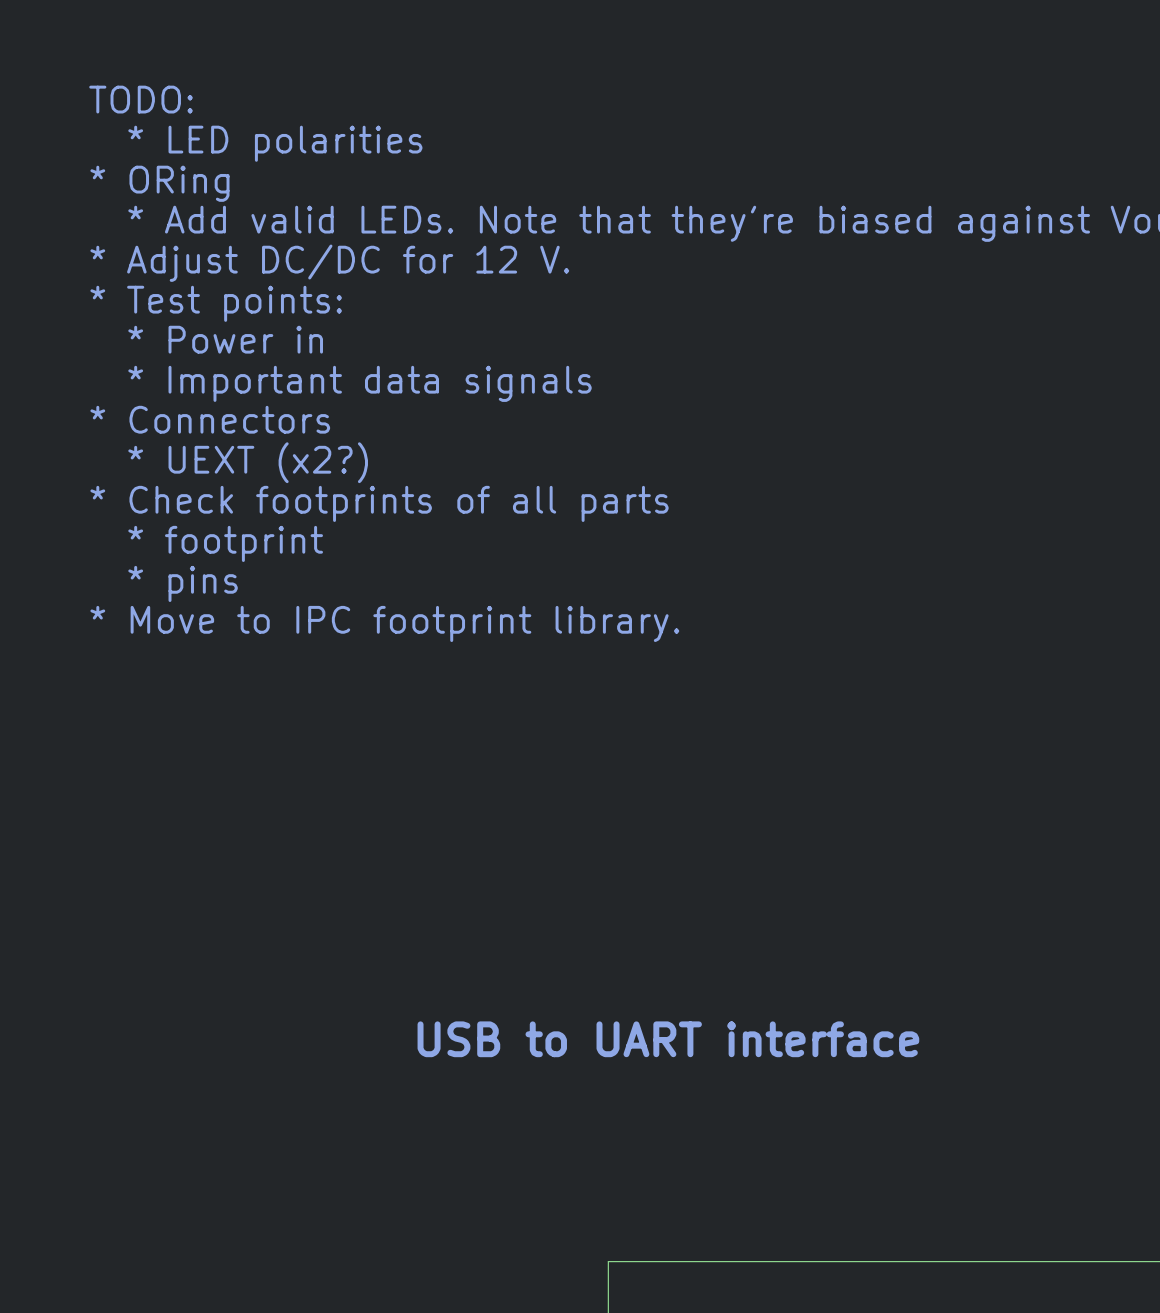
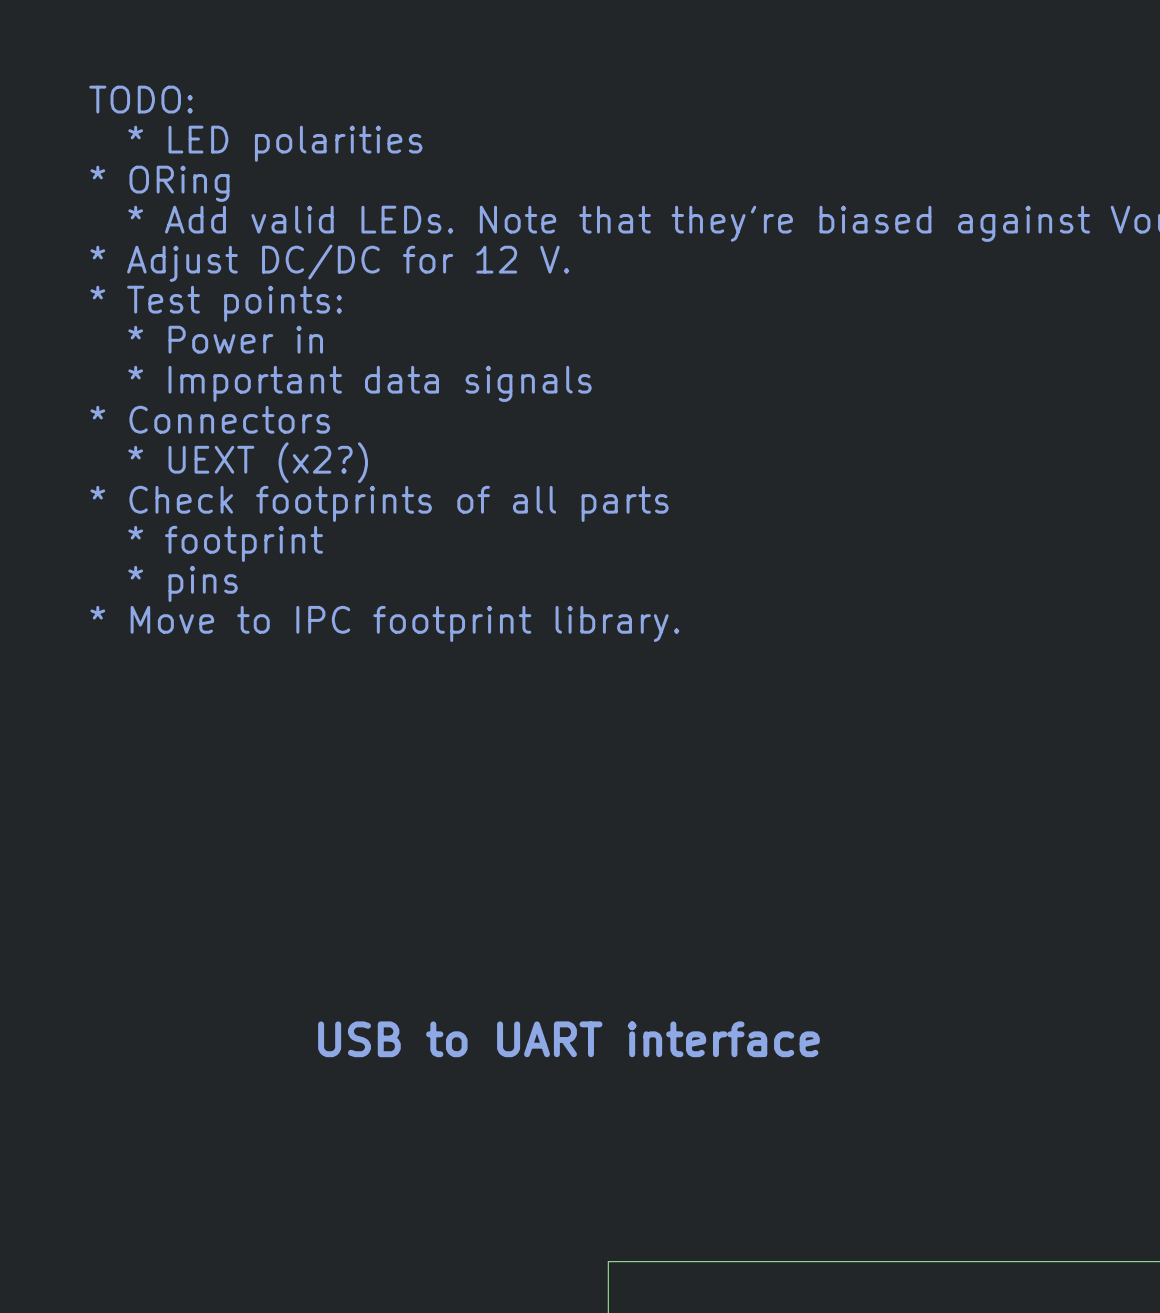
text position: USB to UART interface (668, 1039) -> USB to UART interface (568, 1039)

